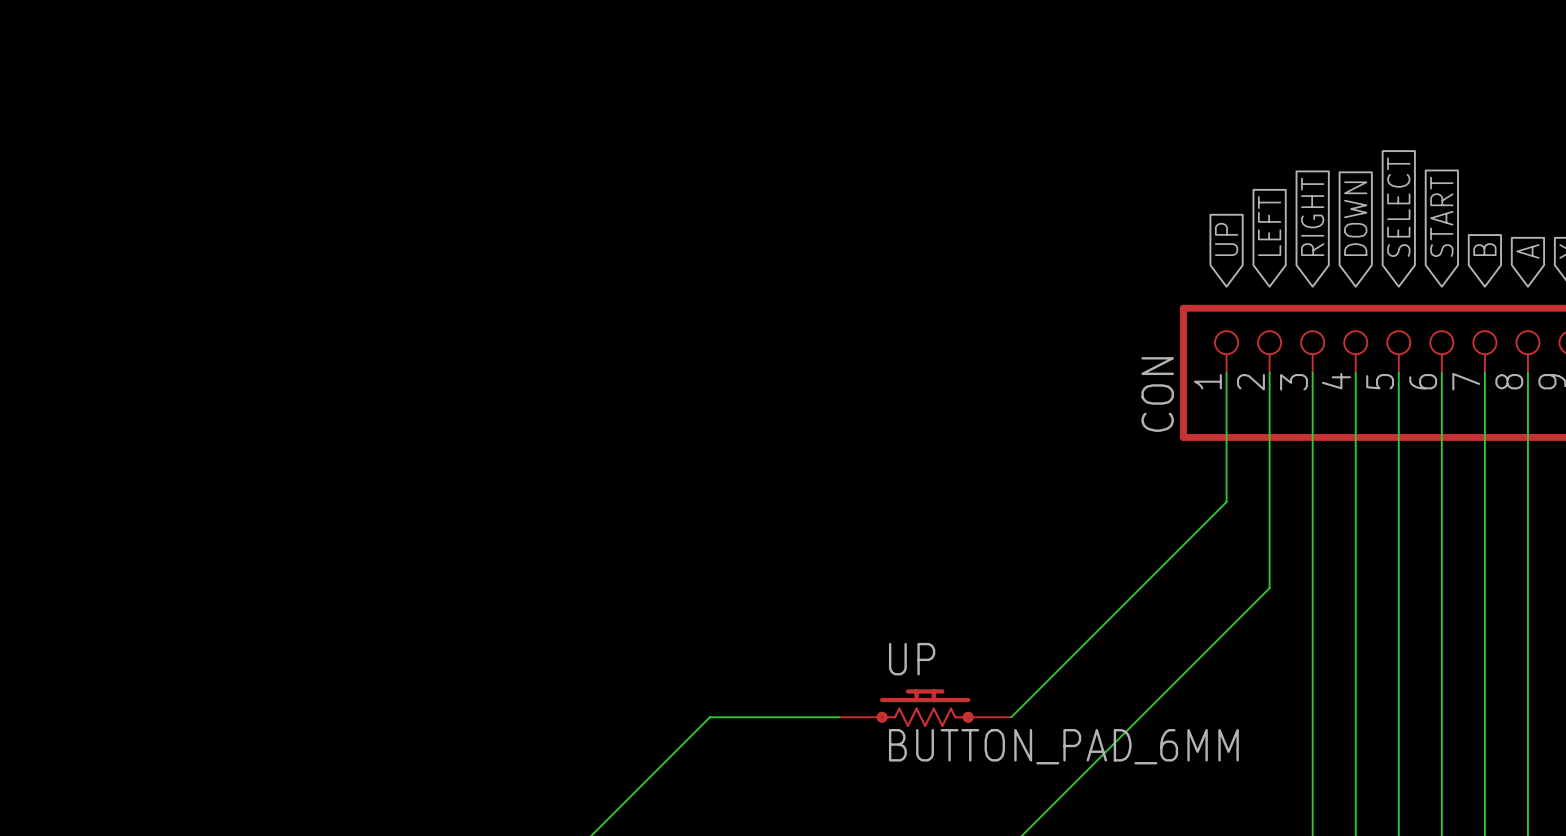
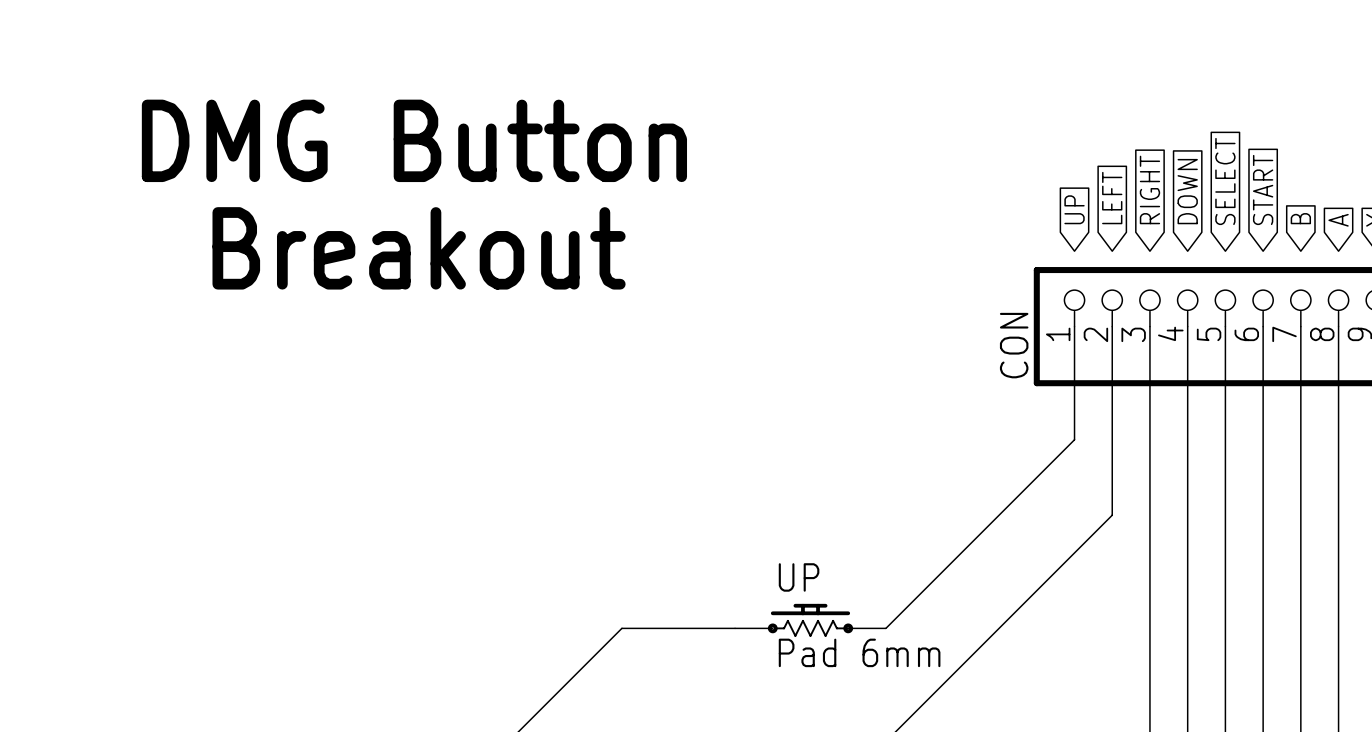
text: none -> DMG Button (414, 140)
text: none -> Breakout (419, 248)
UP value: BUTTON_PAD_6MM (1063, 746) -> Pad 6mm (859, 652)

